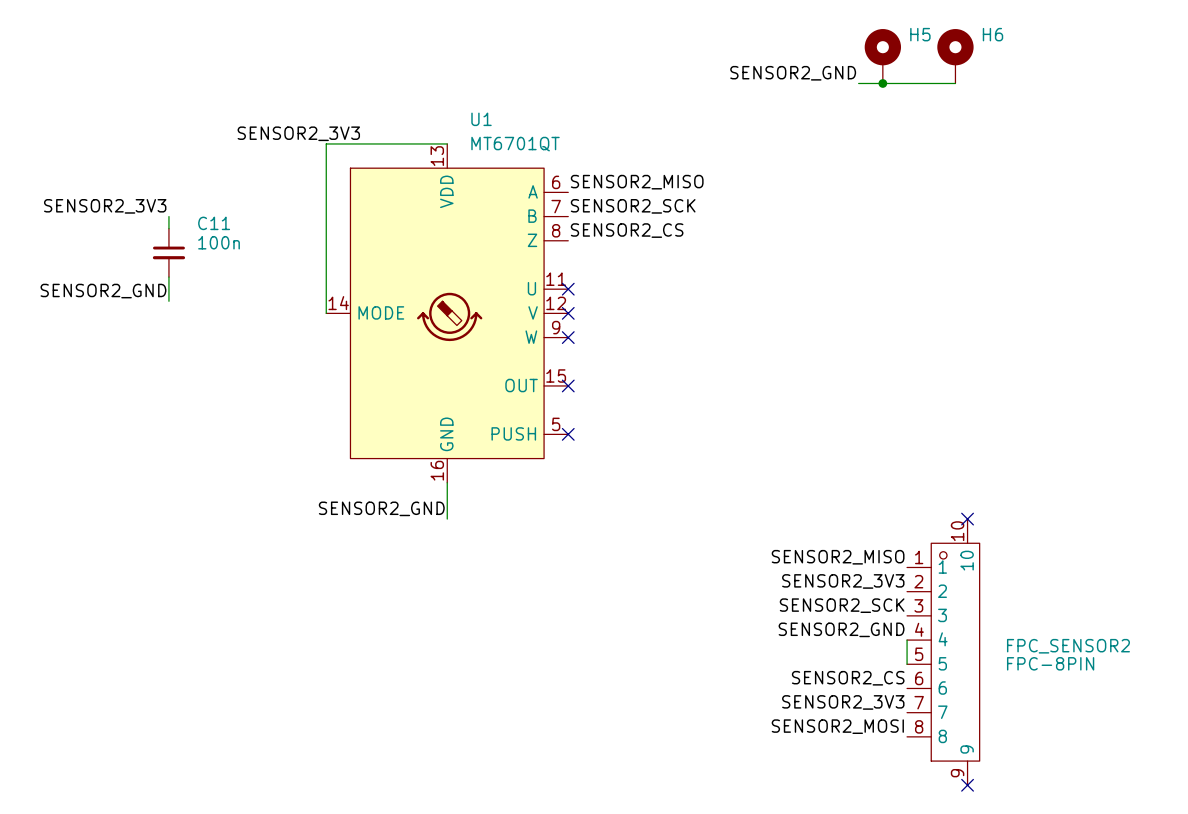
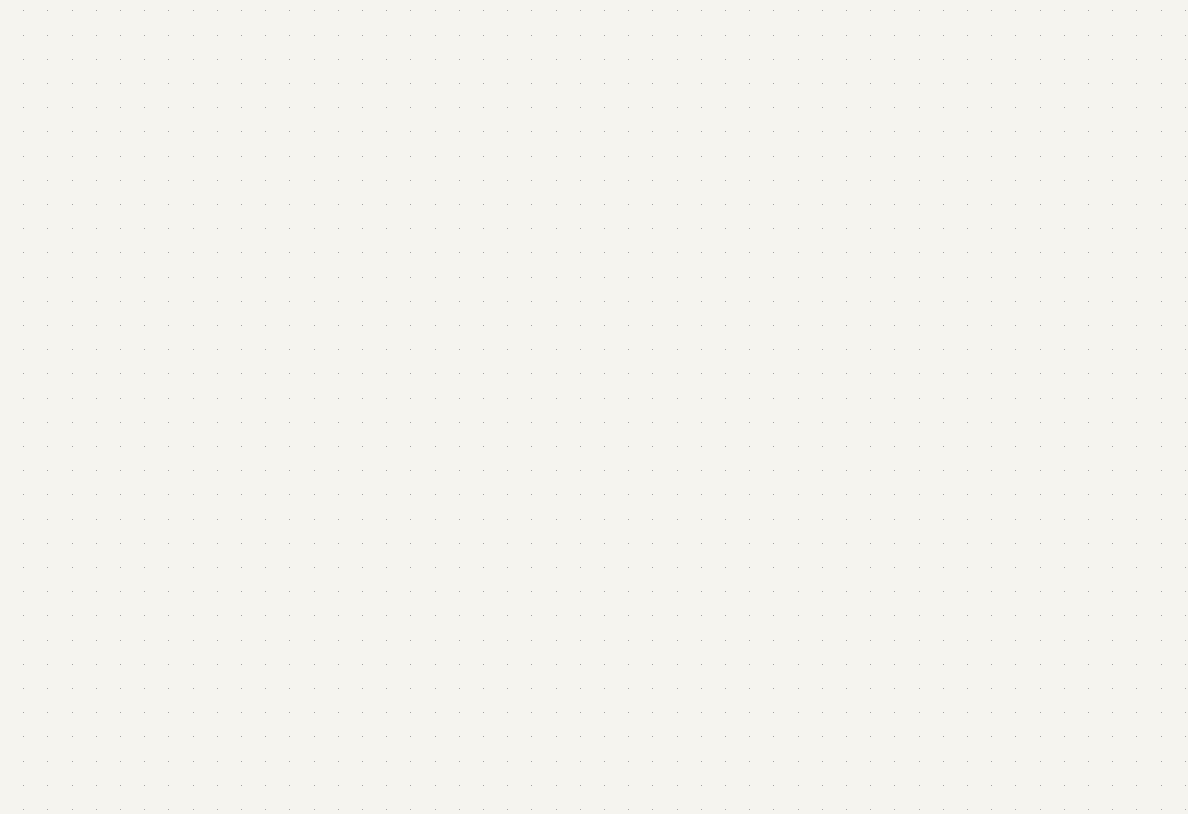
H5: (882, 56) -> none
H6: (955, 56) -> none
label: SENSOR2_GND (793, 73) -> none
wire: (858, 83) (955, 83) -> none
junction: (882, 83) -> none
label: SENSOR2_3V3 (298, 133) -> none
wire: (447, 143) (326, 143) (326, 313) -> none
label: SENSOR2_MISO (637, 182) -> none
label: SENSOR2_3V3 (105, 206) -> none
label: SENSOR2_SCK (633, 206) -> none
wire: (168, 216) (168, 228) -> none
label: SENSOR2_CS (627, 230) -> none
C11: 100n (168, 252) -> none
wire: (168, 277) (168, 301) -> none
no-connect mark: (568, 289) -> none
label: SENSOR2_GND (103, 291) -> none
U1: MT6701QT (447, 313) -> none
no-connect mark: (568, 313) -> none
no-connect mark: (568, 337) -> none
no-connect mark: (568, 385) -> none
no-connect mark: (568, 434) -> none
wire: (447, 482) (447, 519) -> none
label: SENSOR2_GND (381, 508) -> none
no-connect mark: (967, 519) -> none
label: SENSOR2_MISO (838, 557) -> none
label: SENSOR2_3V3 (843, 581) -> none
label: SENSOR2_SCK (842, 605) -> none
label: SENSOR2_GND (841, 629) -> none
wire: (907, 640) (907, 664) -> none
FPC_SENSOR2: FPC-8PIN (943, 652) -> none
label: SENSOR2_CS (848, 678) -> none
label: SENSOR2_3V3 (843, 702) -> none
label: SENSOR2_MOSI (837, 726) -> none
no-connect mark: (967, 785) -> none

